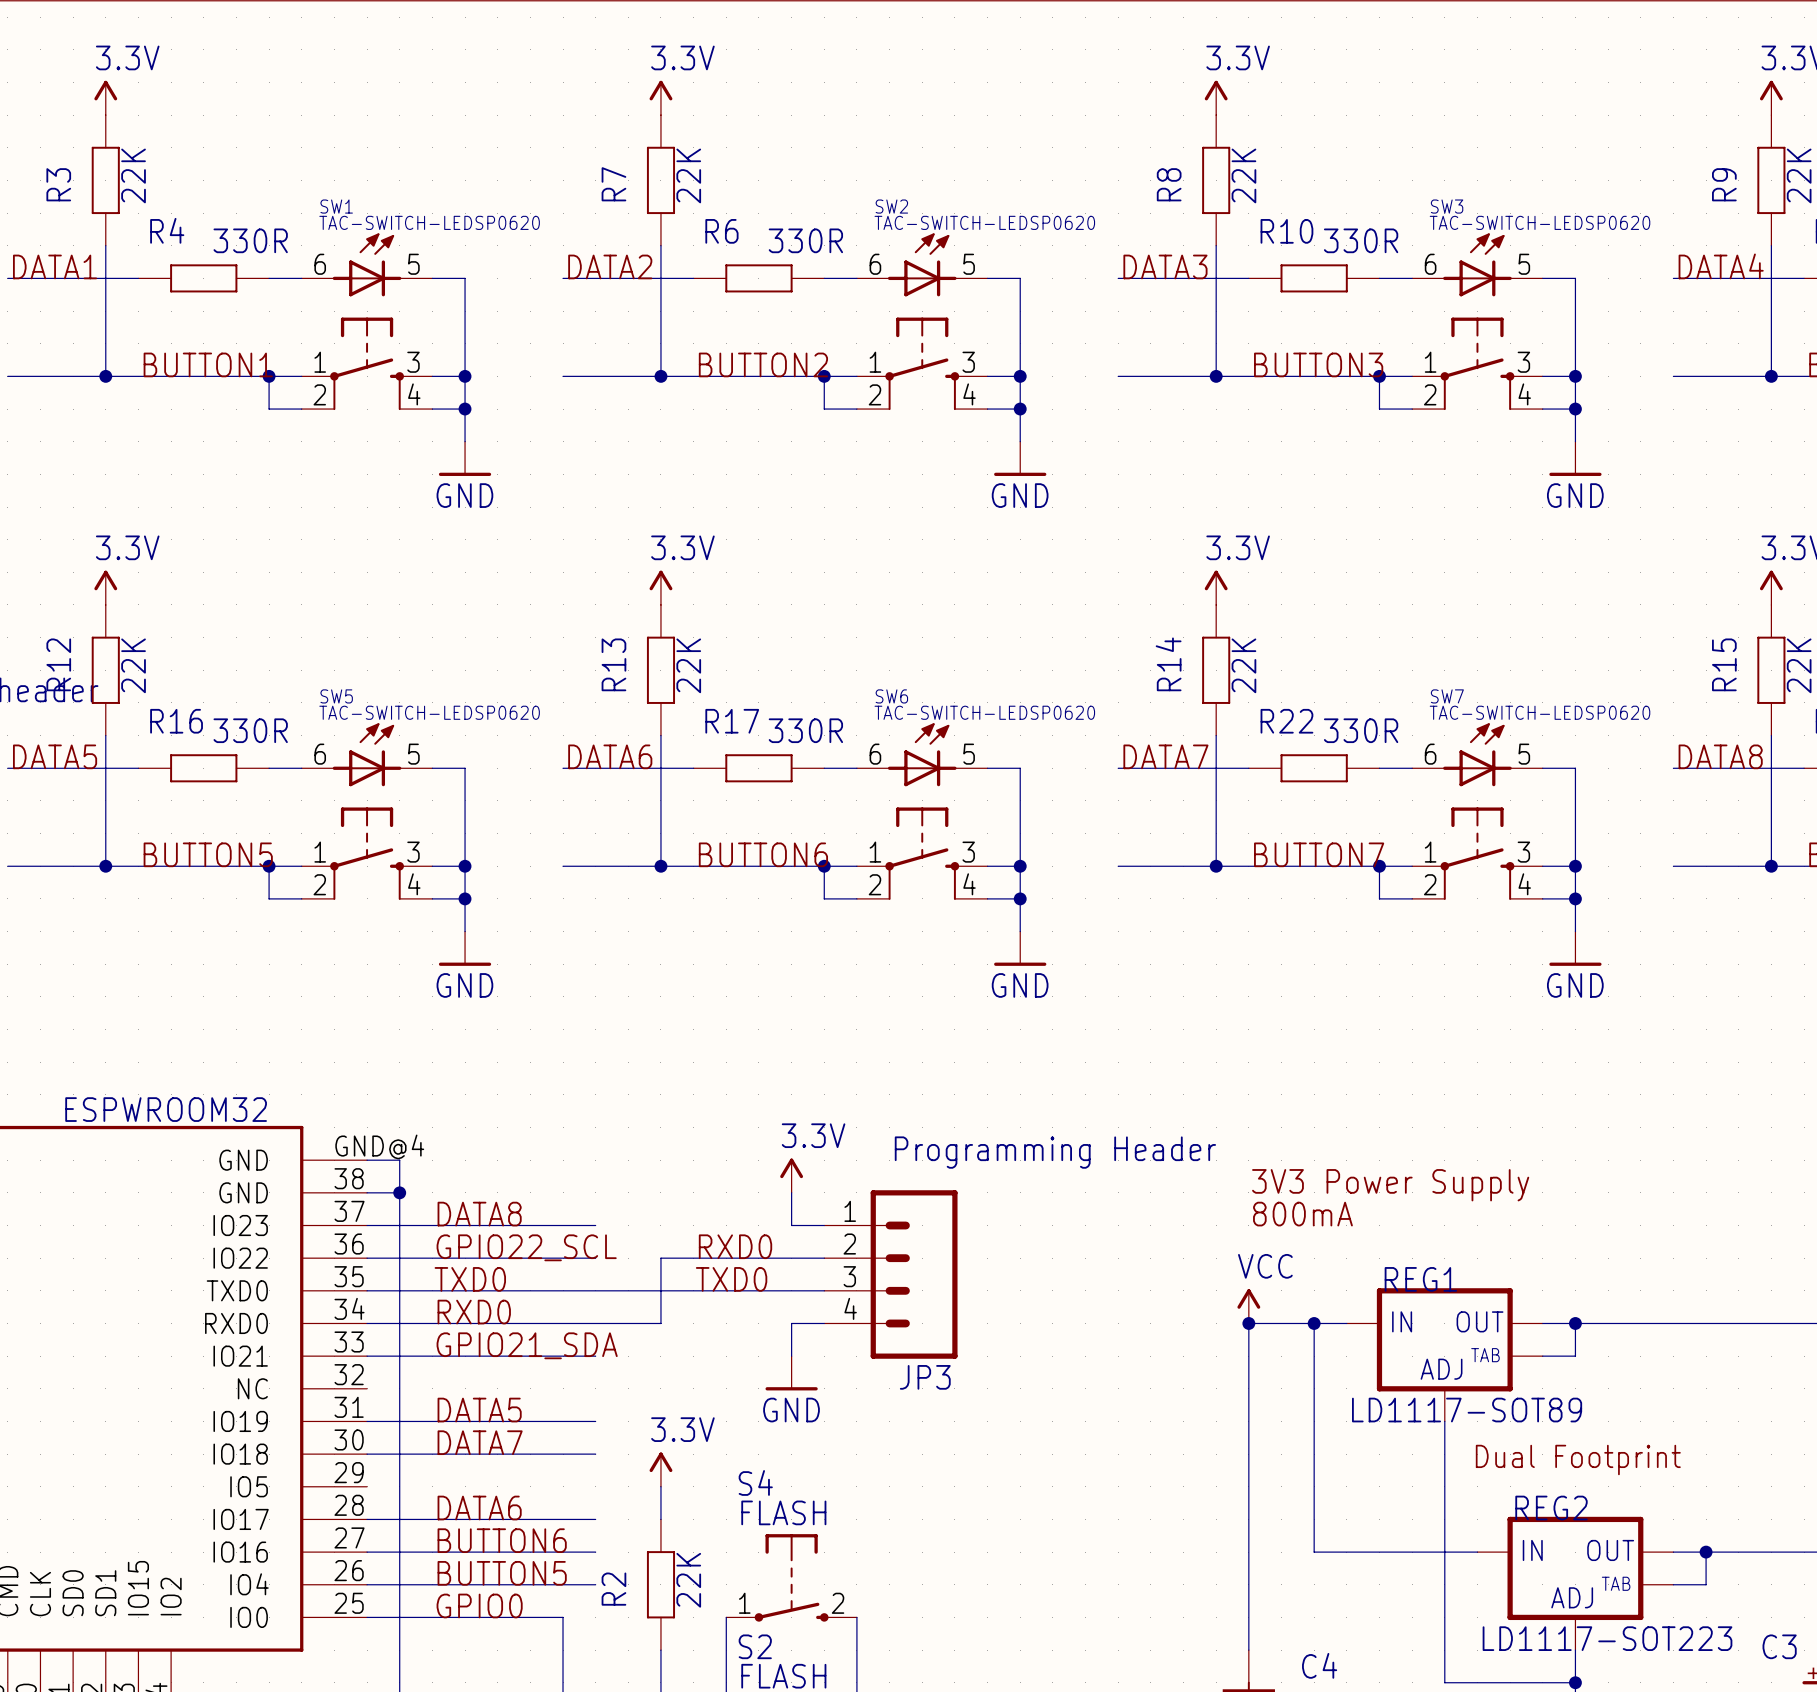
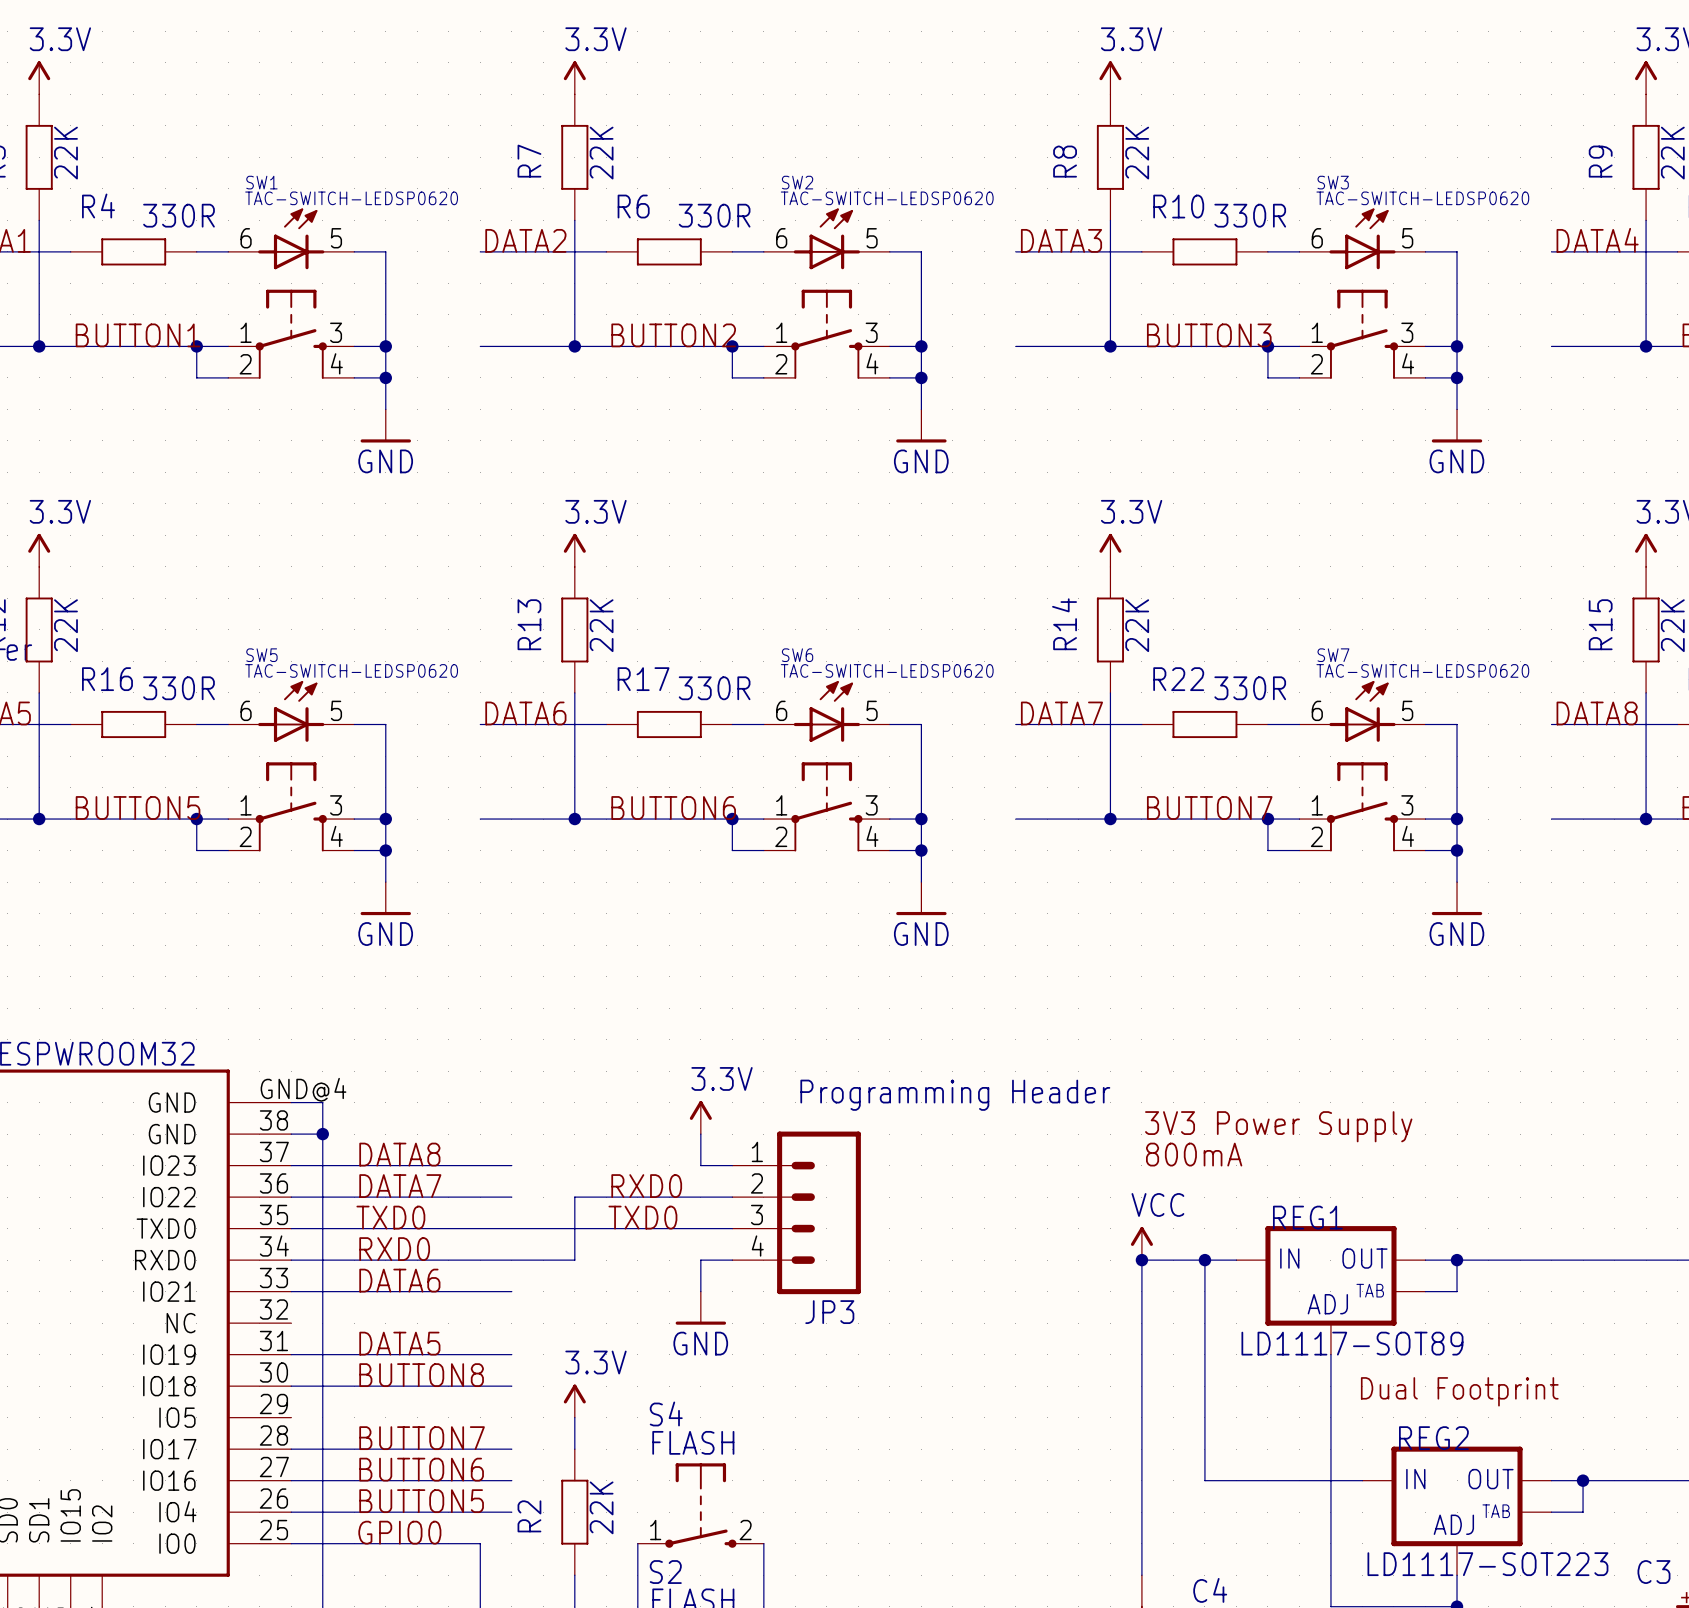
label: GPIO22_SCL (526, 1247) -> DATA7 (400, 1186)
label: GPIO21_SDA (527, 1345) -> DATA6 (399, 1280)
label: DATA7 (480, 1442) -> BUTTON8 (421, 1375)
label: DATA6 (479, 1508) -> BUTTON7 (422, 1438)

